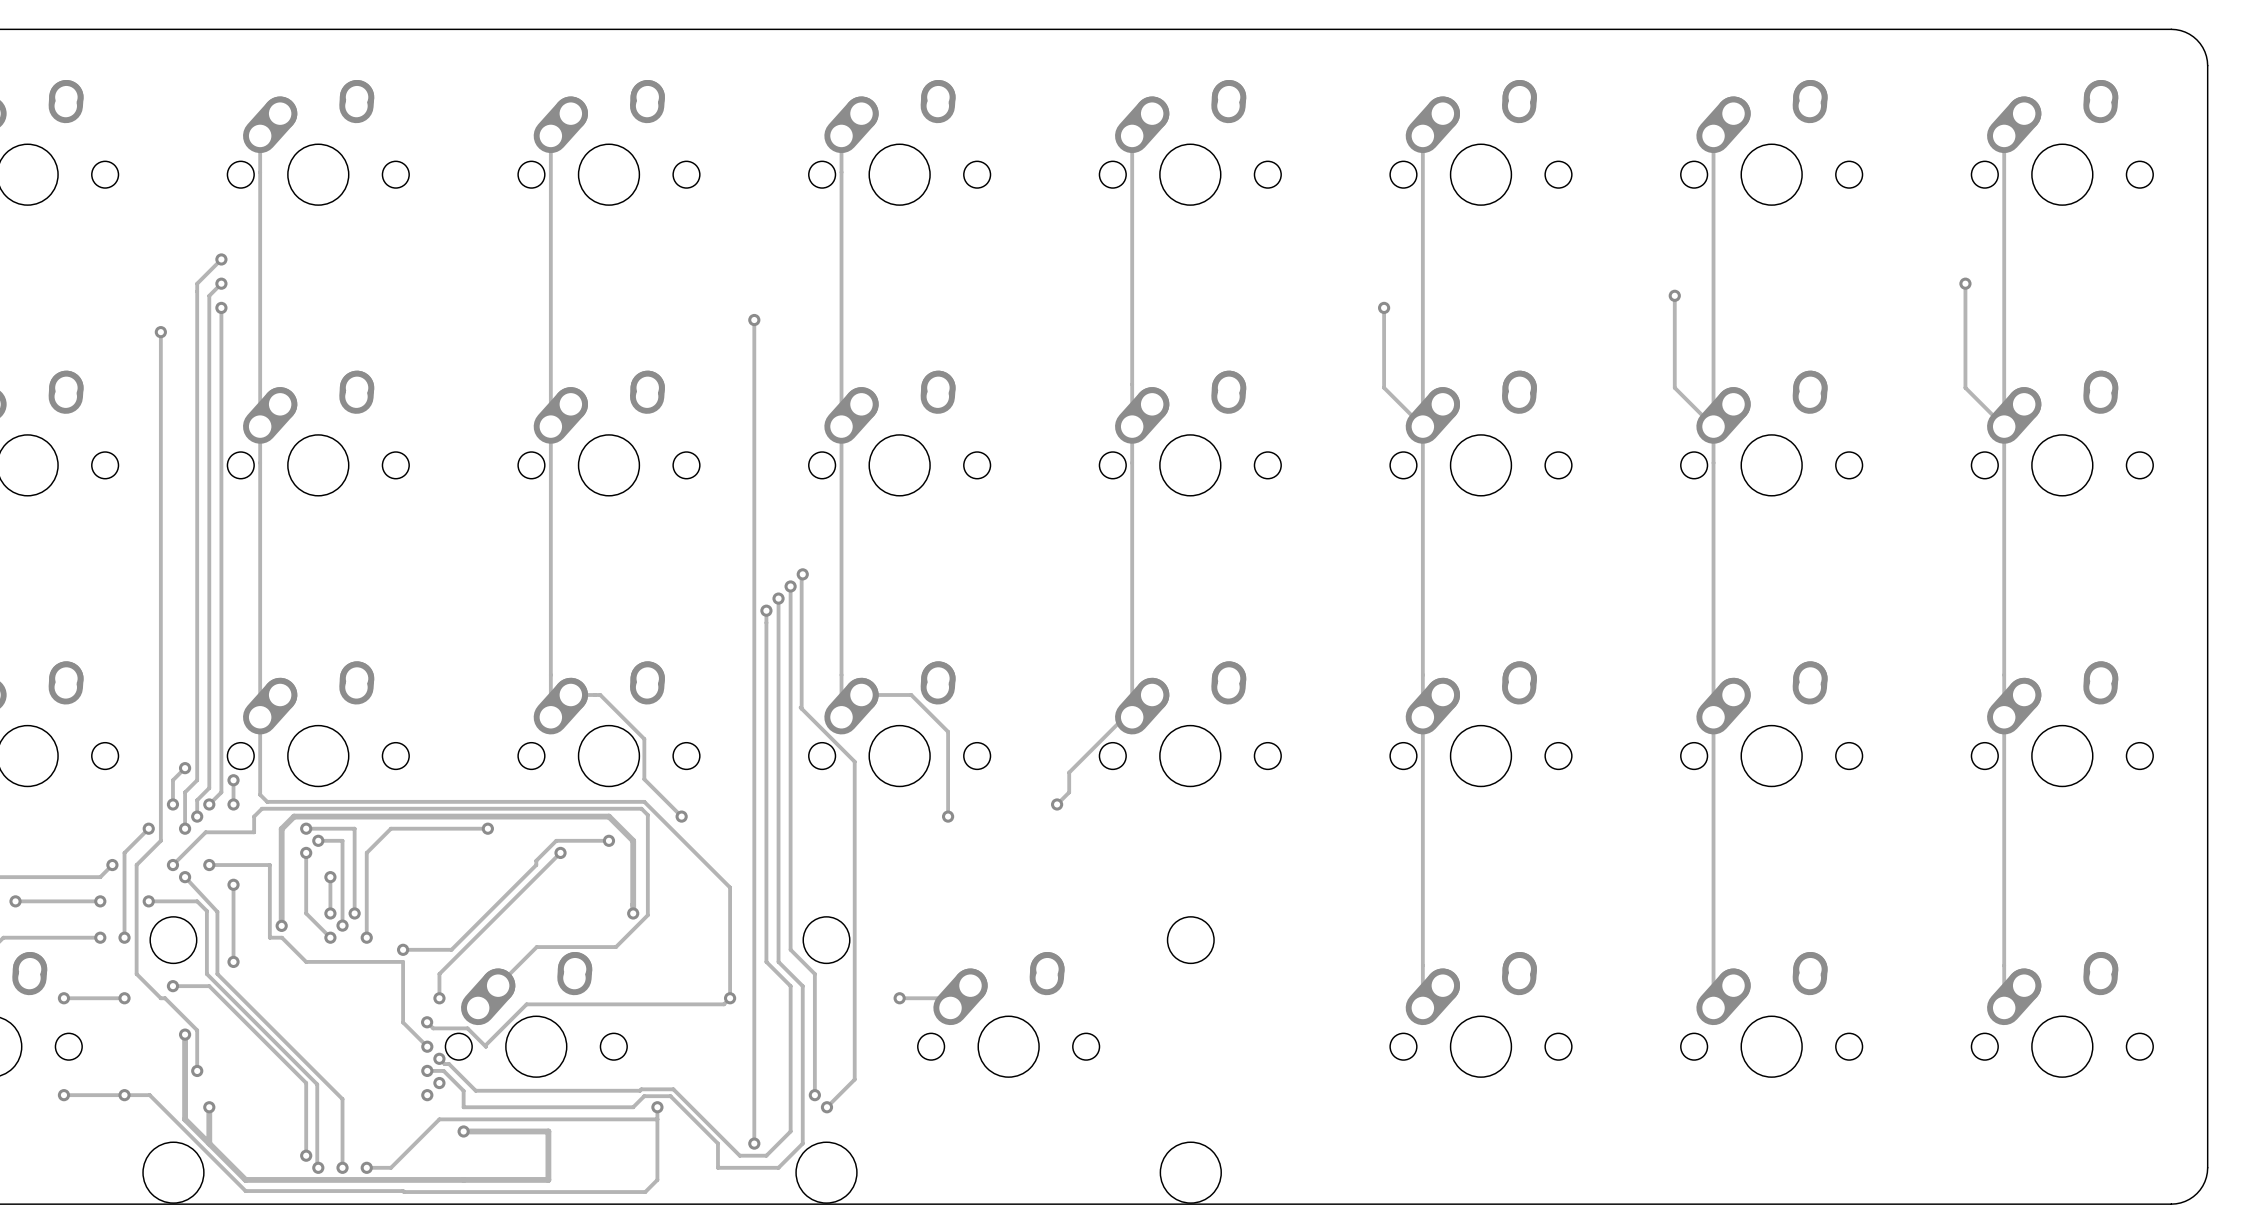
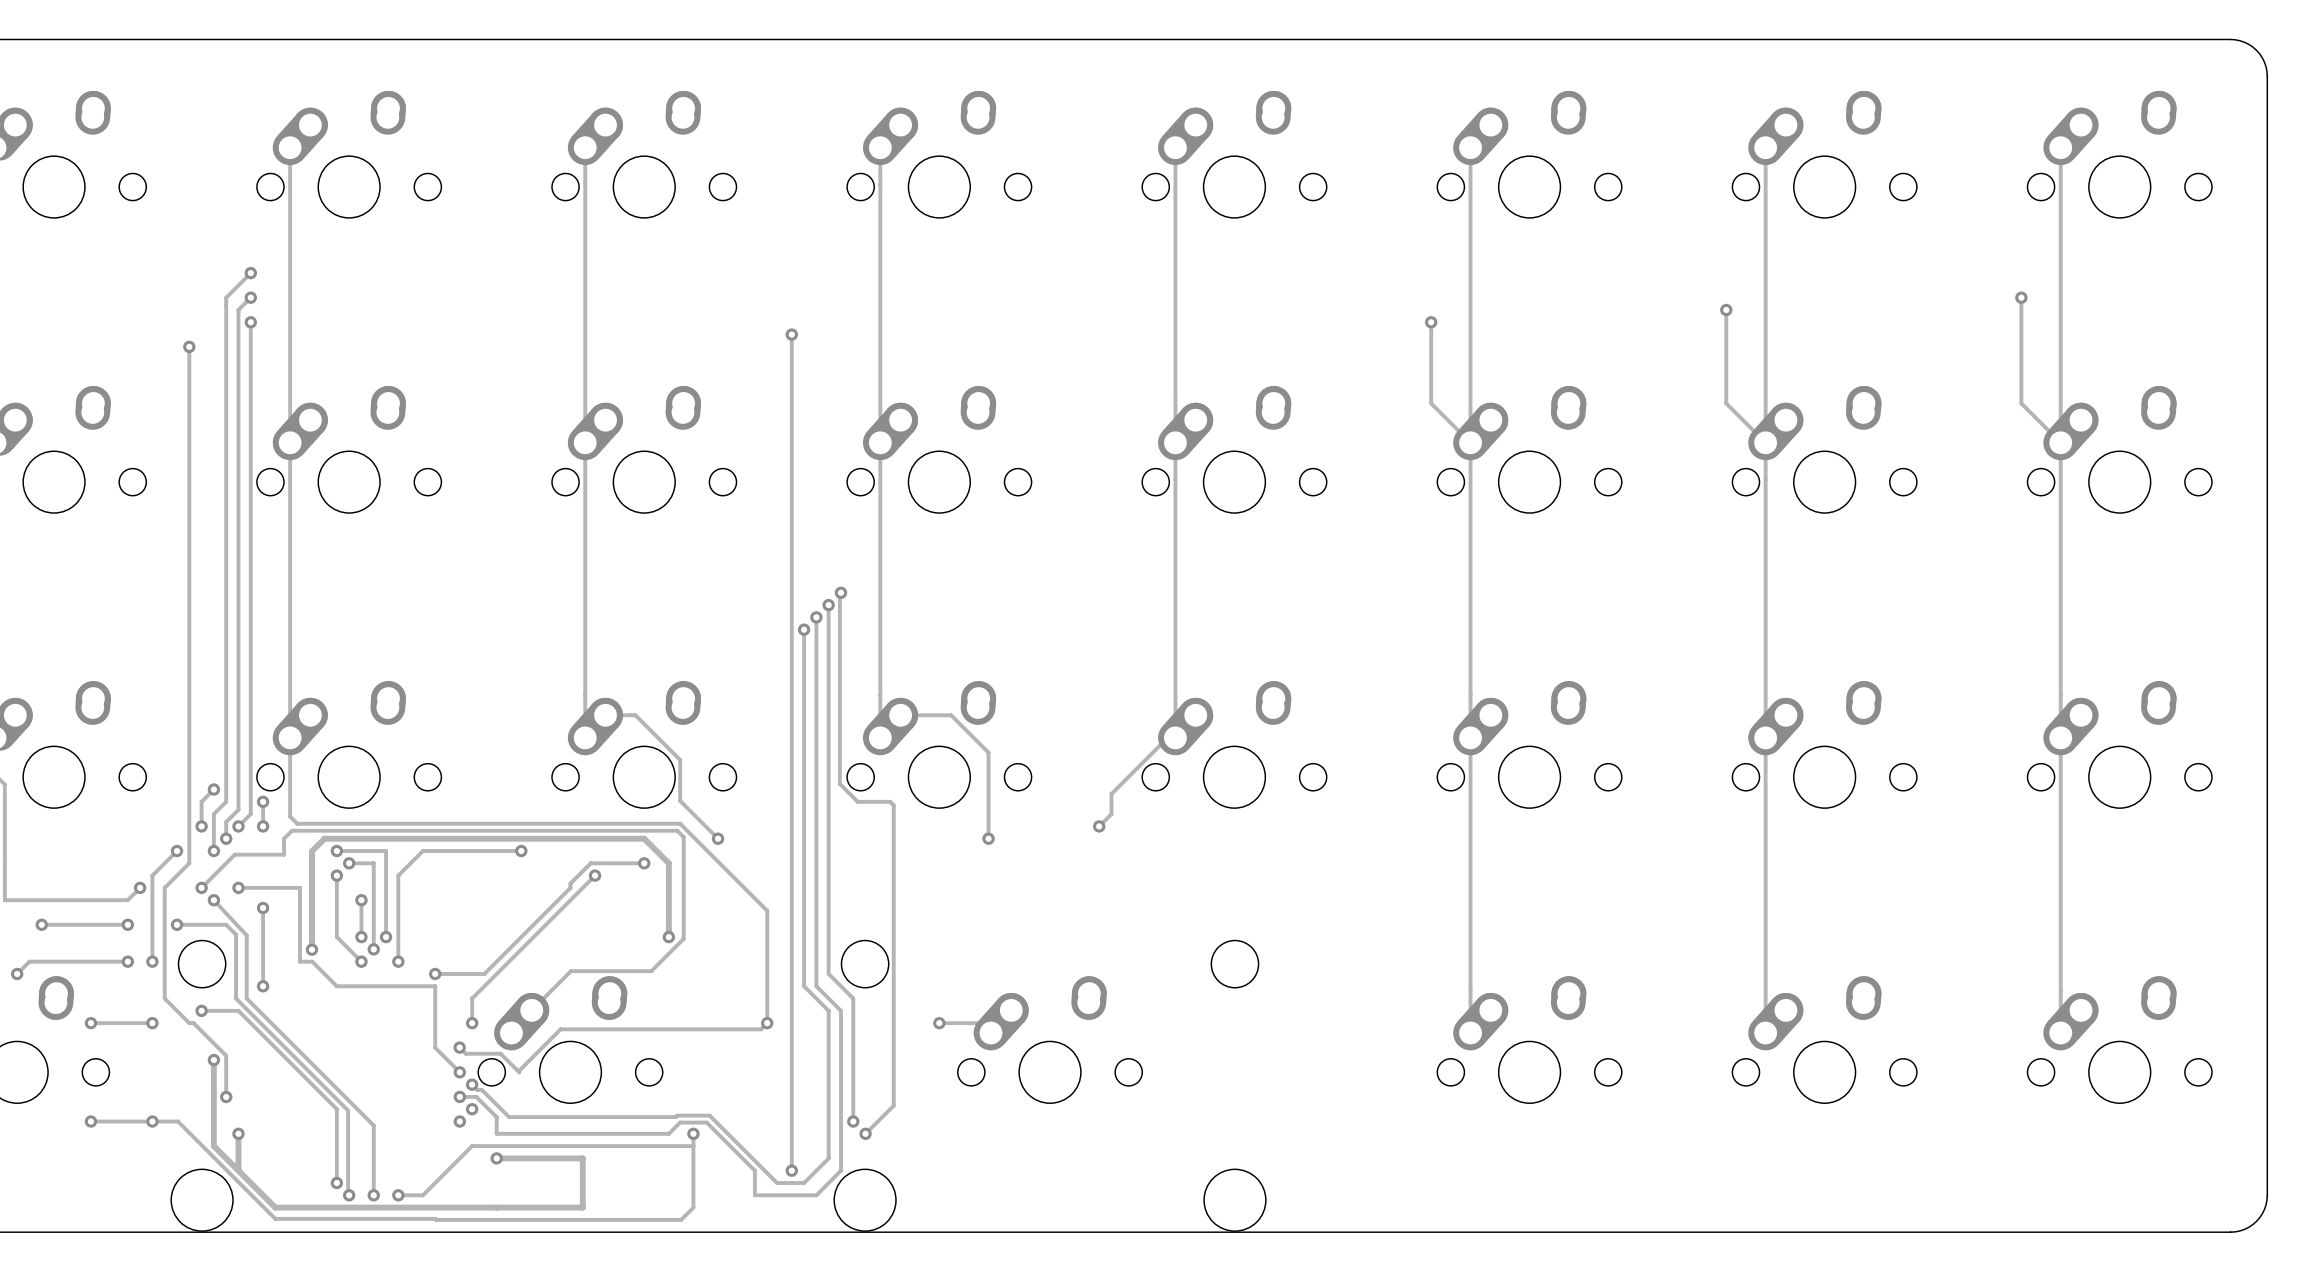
track: (800, 707) (854, 761) (854, 783) -> (839, 729) (839, 783) (857, 801) (890, 801) (893, 805)

